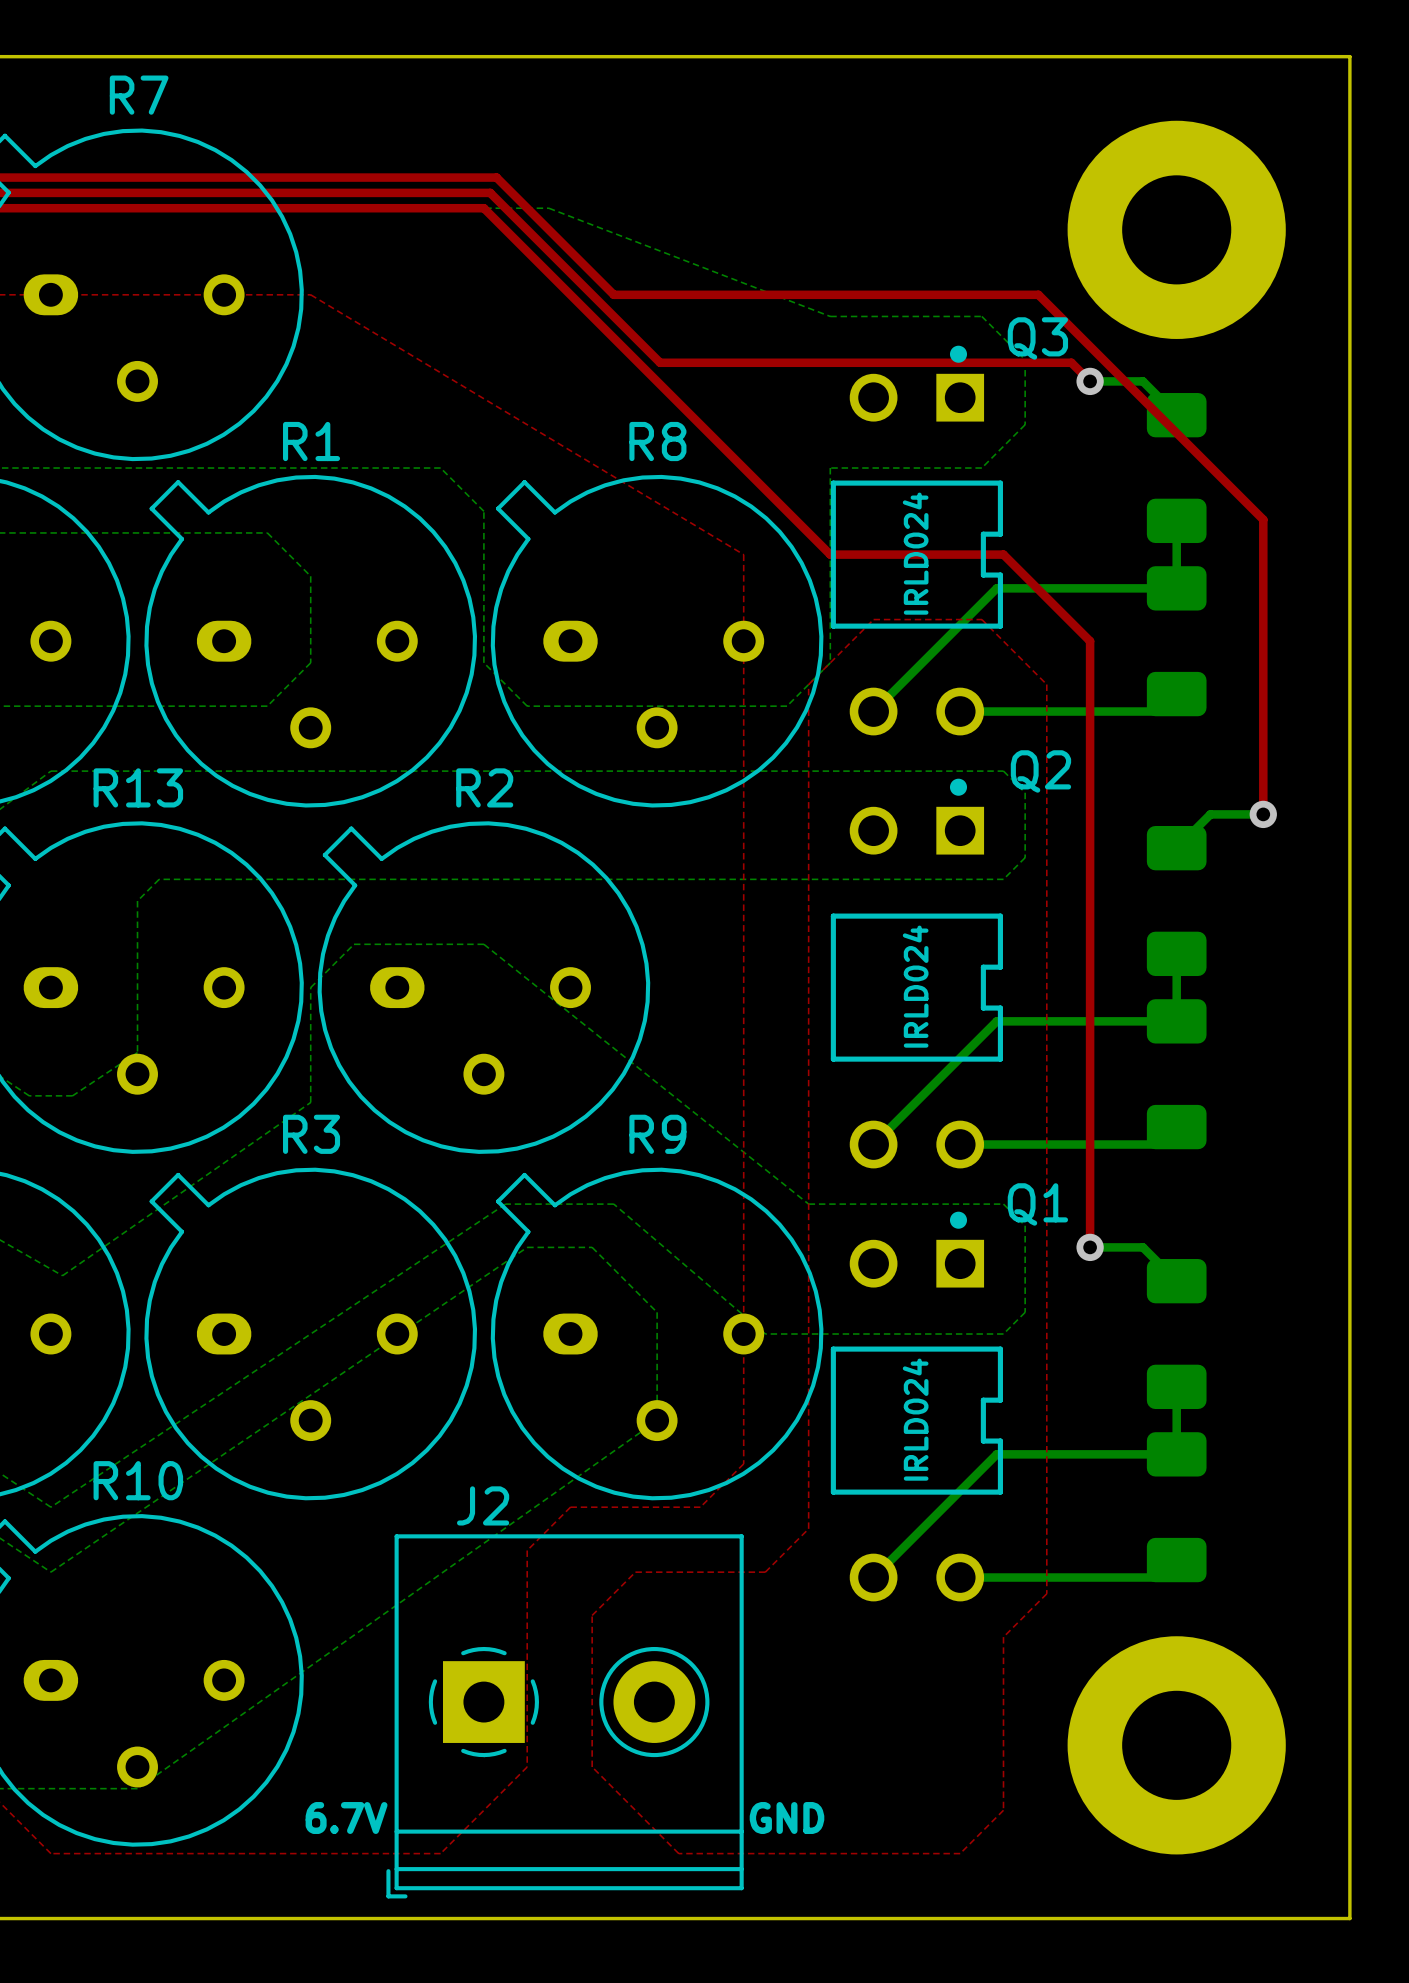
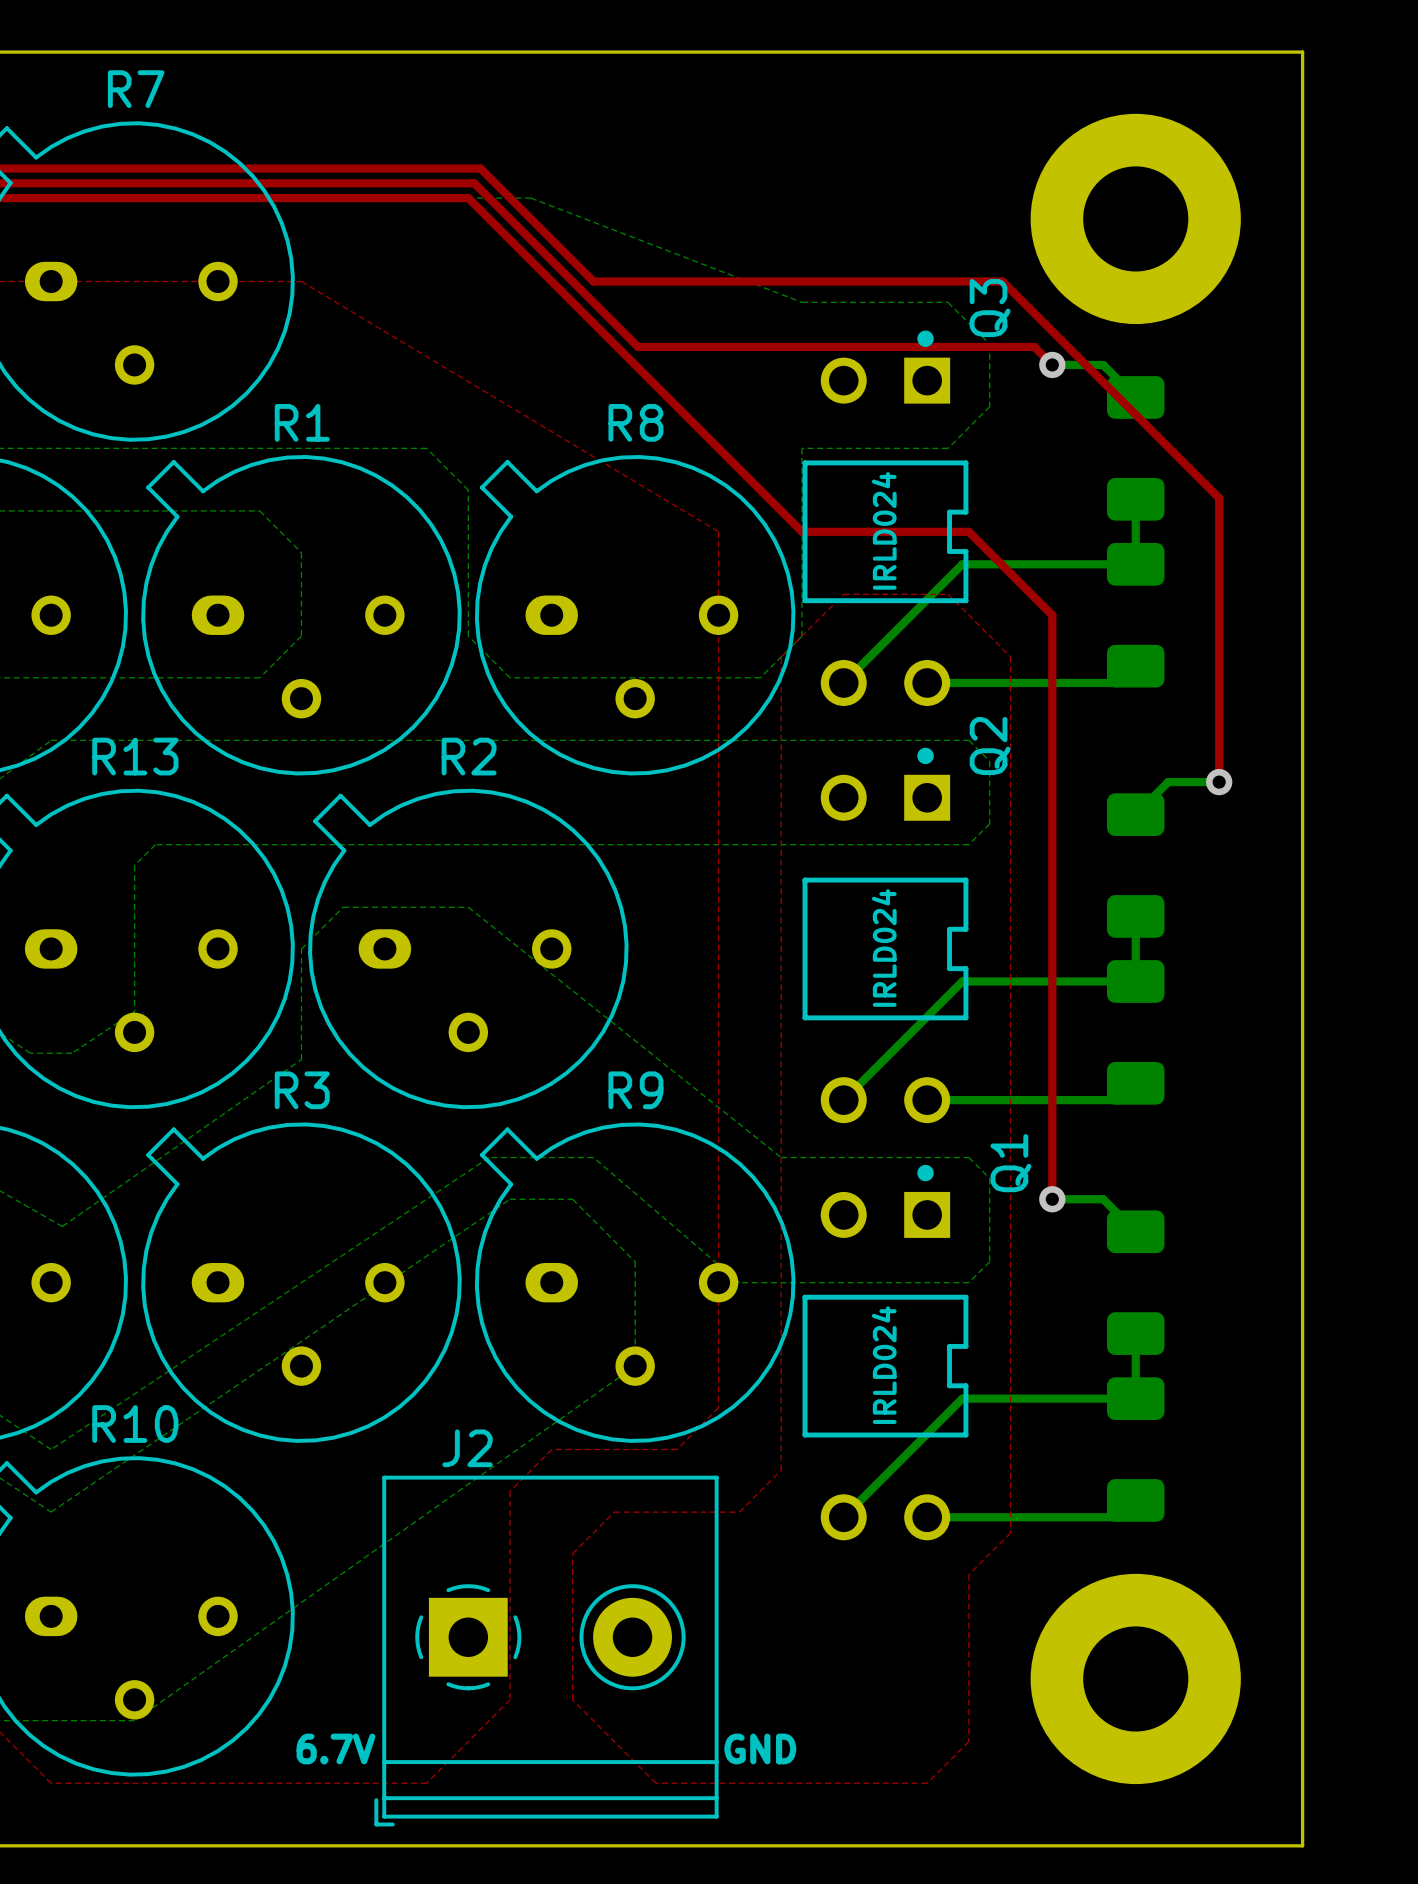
Q3 name rotation: 0° (1037, 338) -> 90° counterclockwise (990, 308)
Q2 name rotation: 0° (1040, 771) -> 90° counterclockwise (990, 746)
Q1 name rotation: 0° (1037, 1204) -> 90° counterclockwise (1010, 1163)

